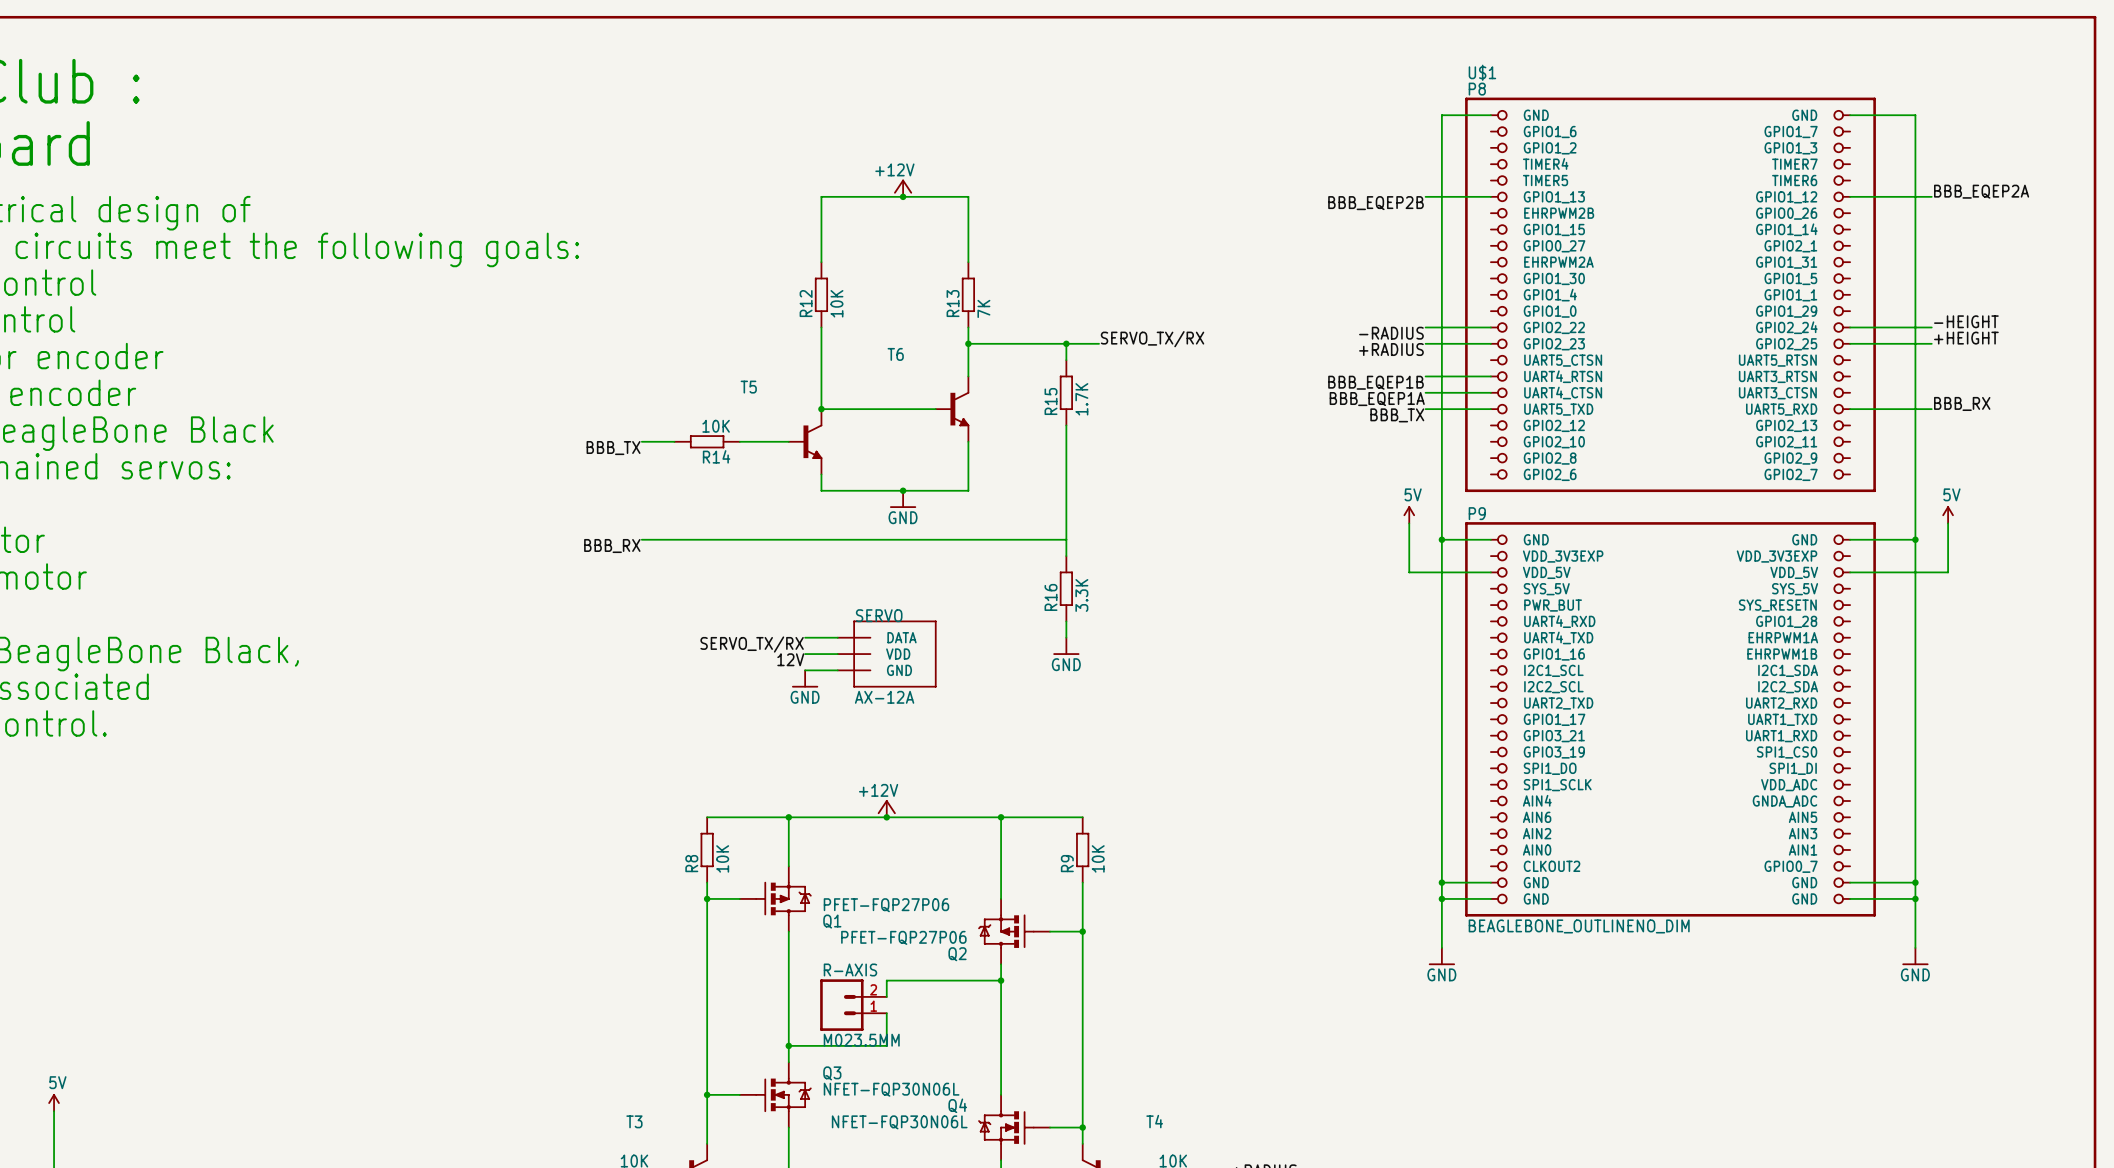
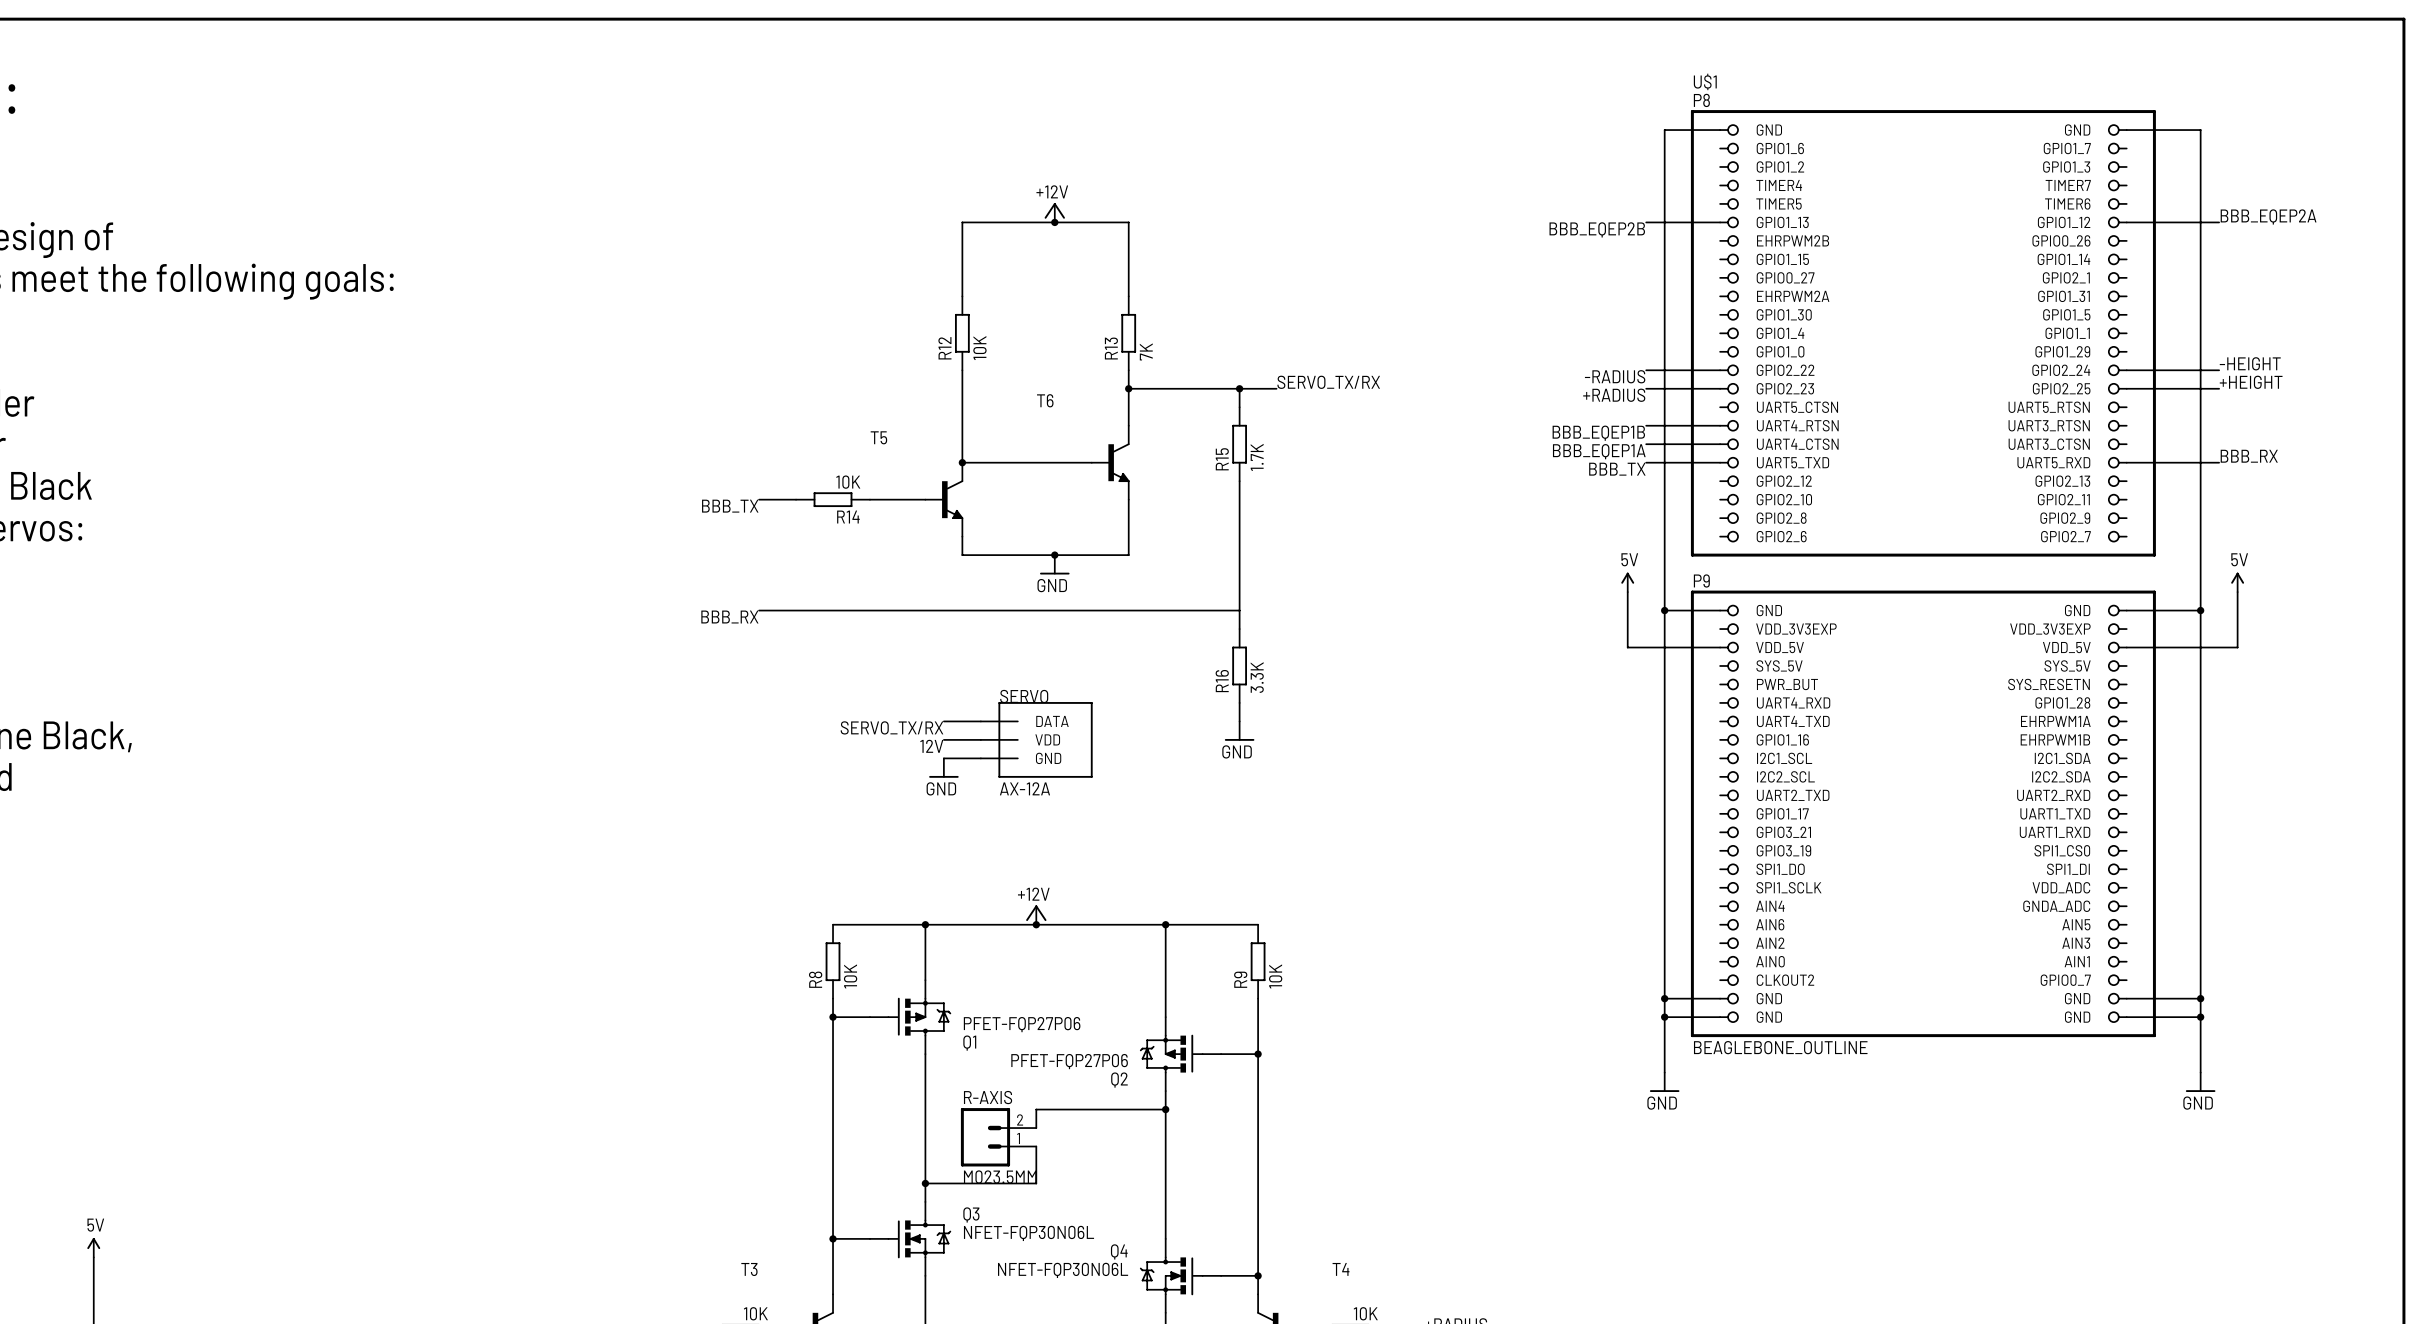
U$1 value: BEAGLEBONE_OUTLINENO_DIM (1579, 926) -> BEAGLEBONE_OUTLINE (1780, 1047)

